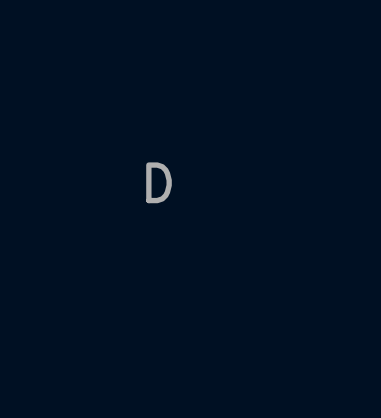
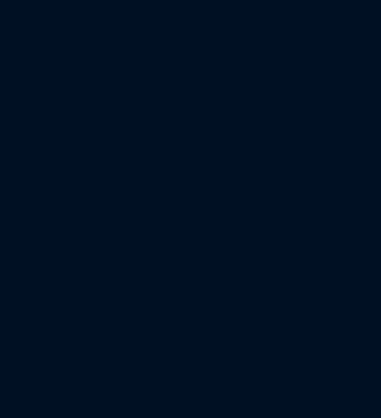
part: D (159, 182) -> none

